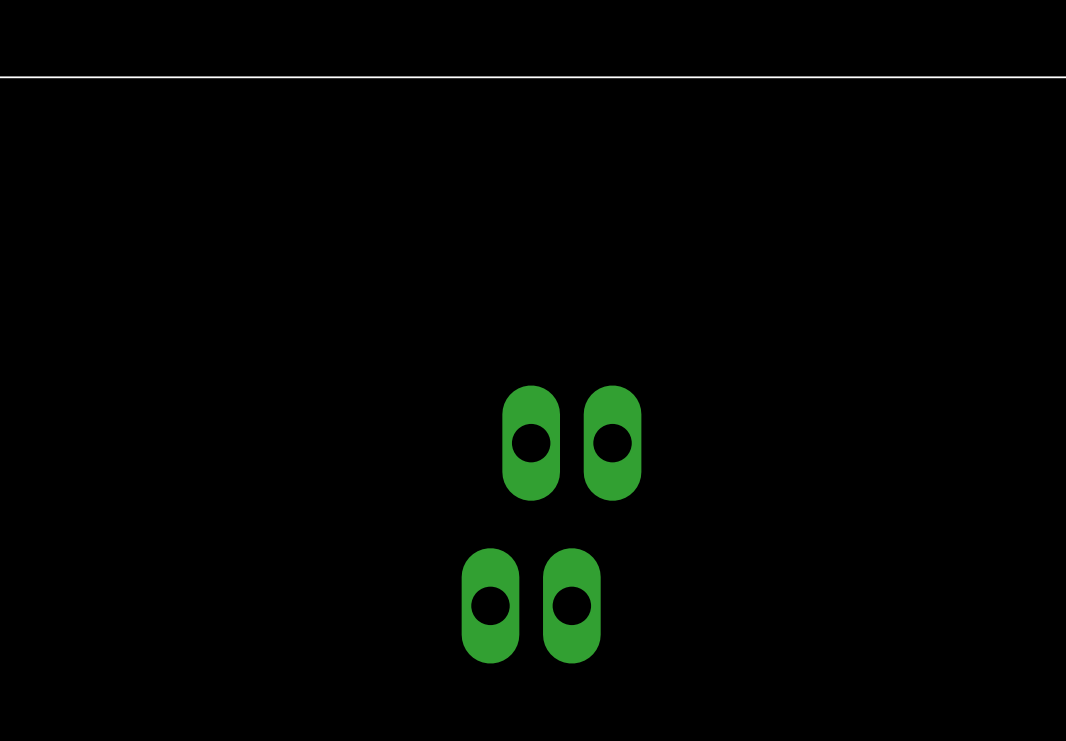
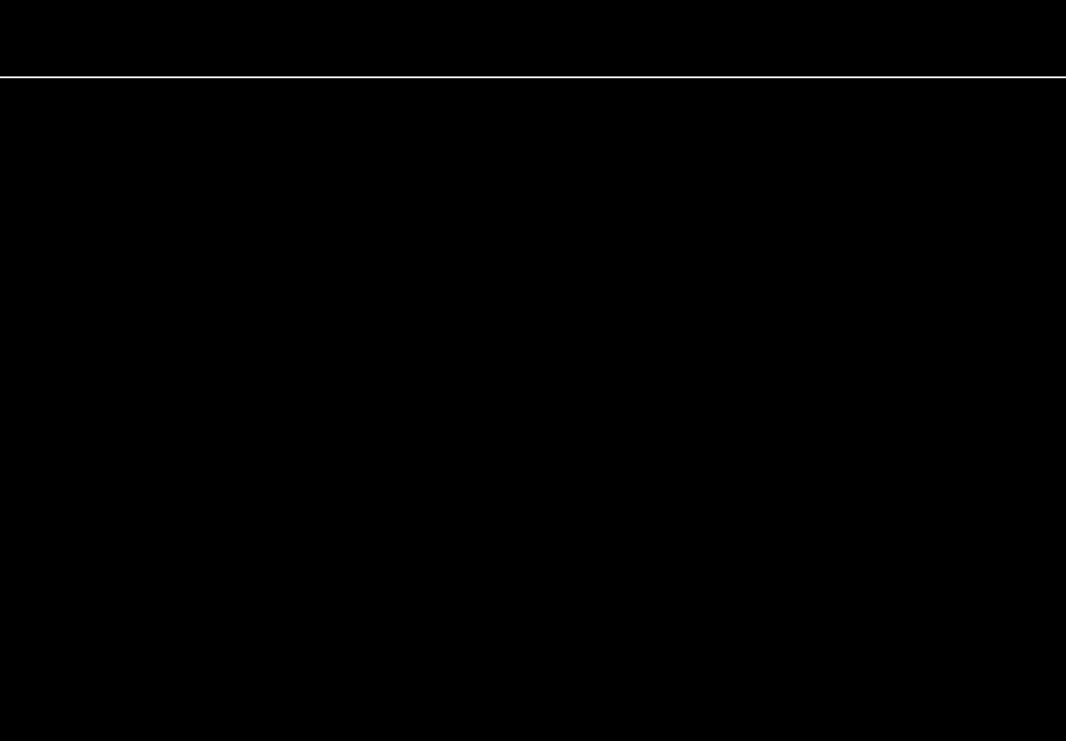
part: (571, 443) -> none
part: (531, 605) -> none

